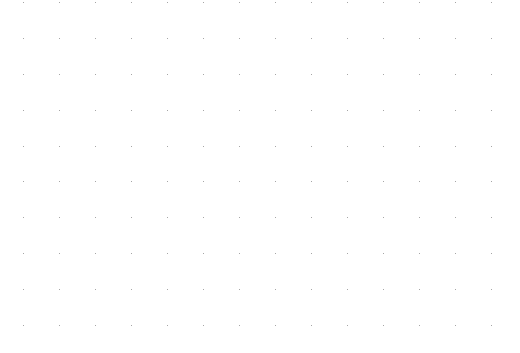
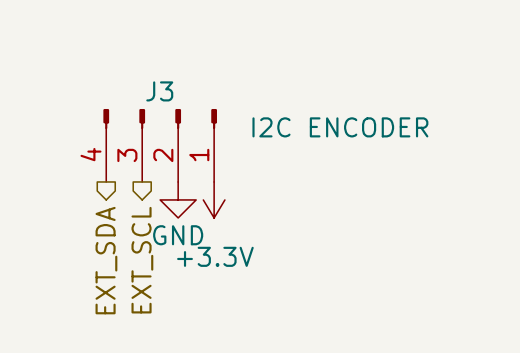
J3: none -> I2C ENCODER (160, 145)
power symbol: none -> GND (178, 199)
power symbol: none -> +3.3V (214, 199)
hierarchical label: none -> EXT_SDA (106, 260)
hierarchical label: none -> EXT_SCL (142, 260)

